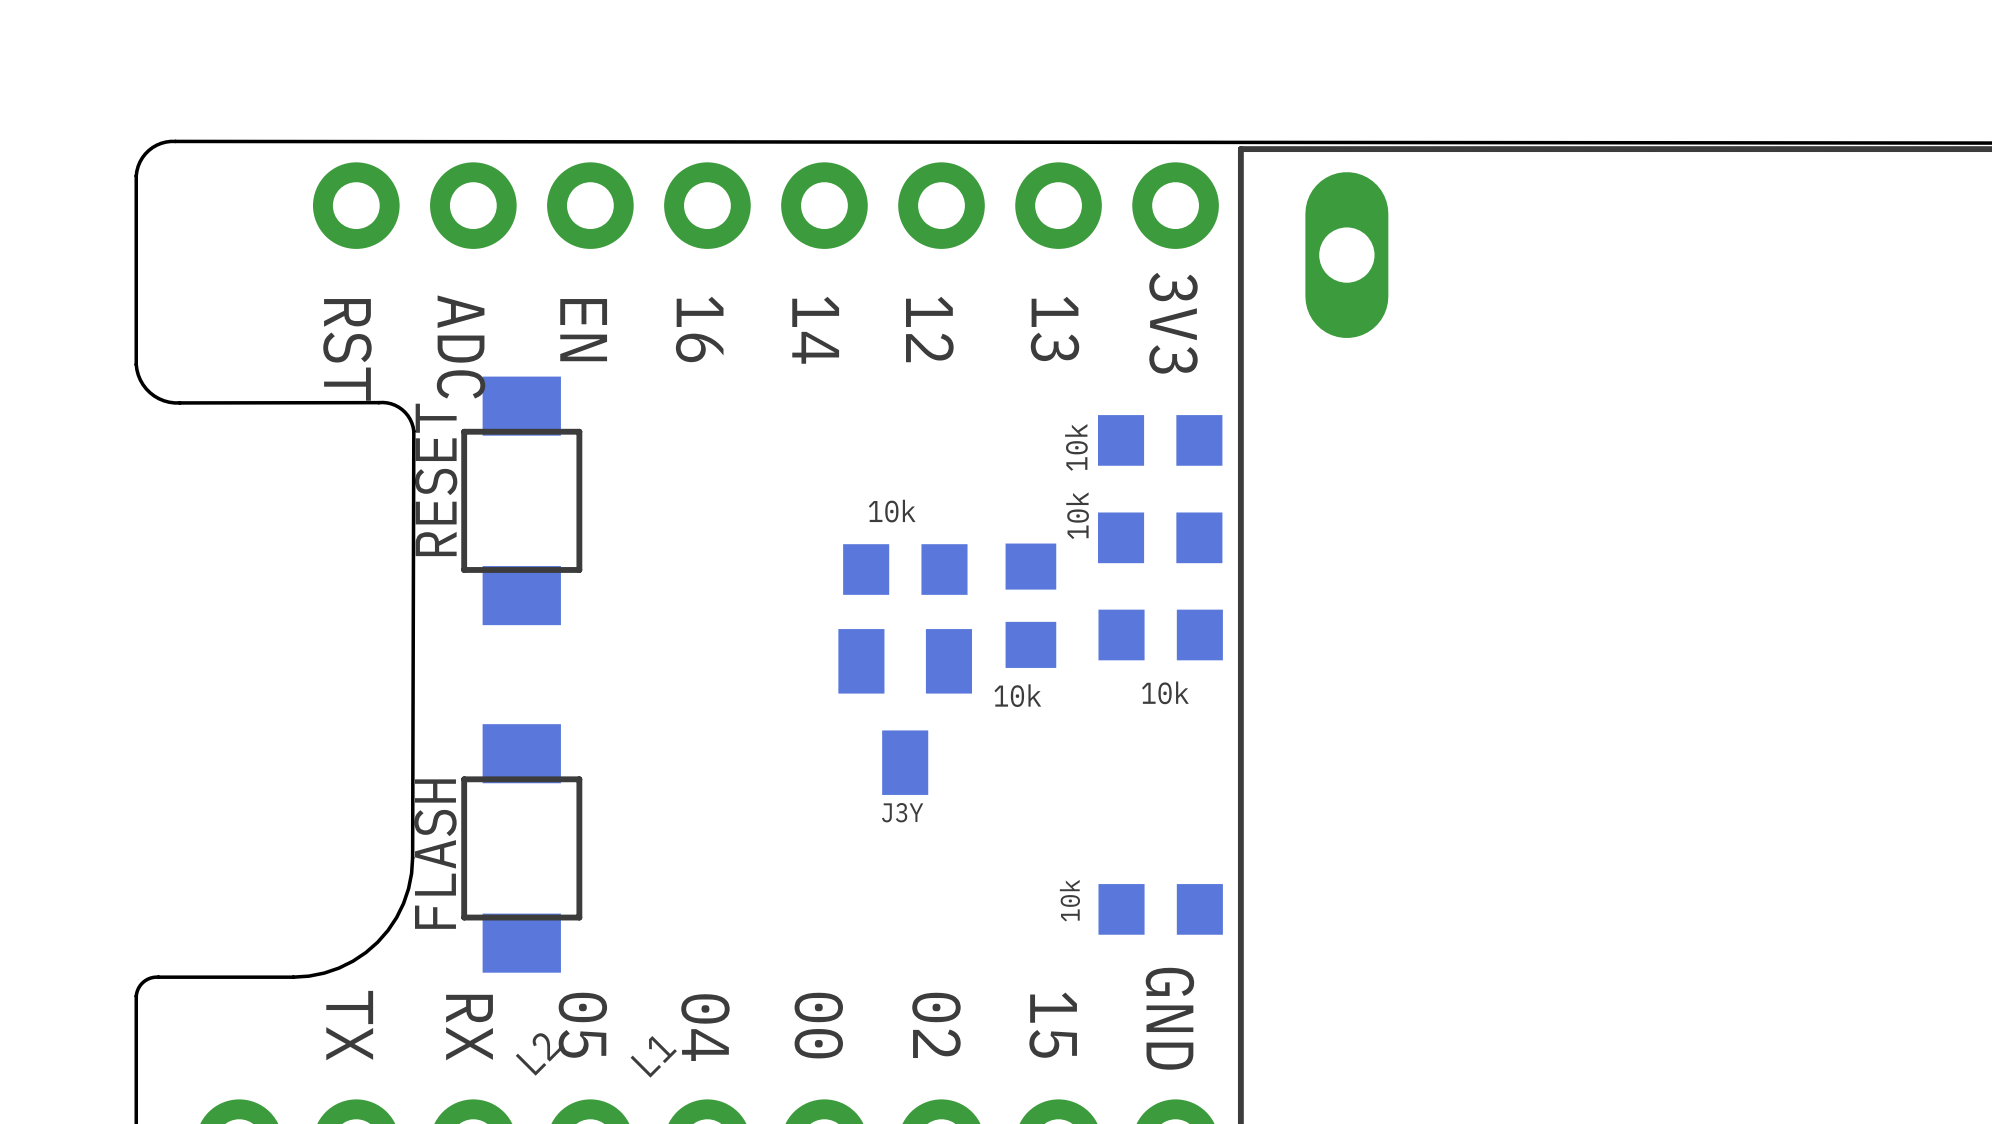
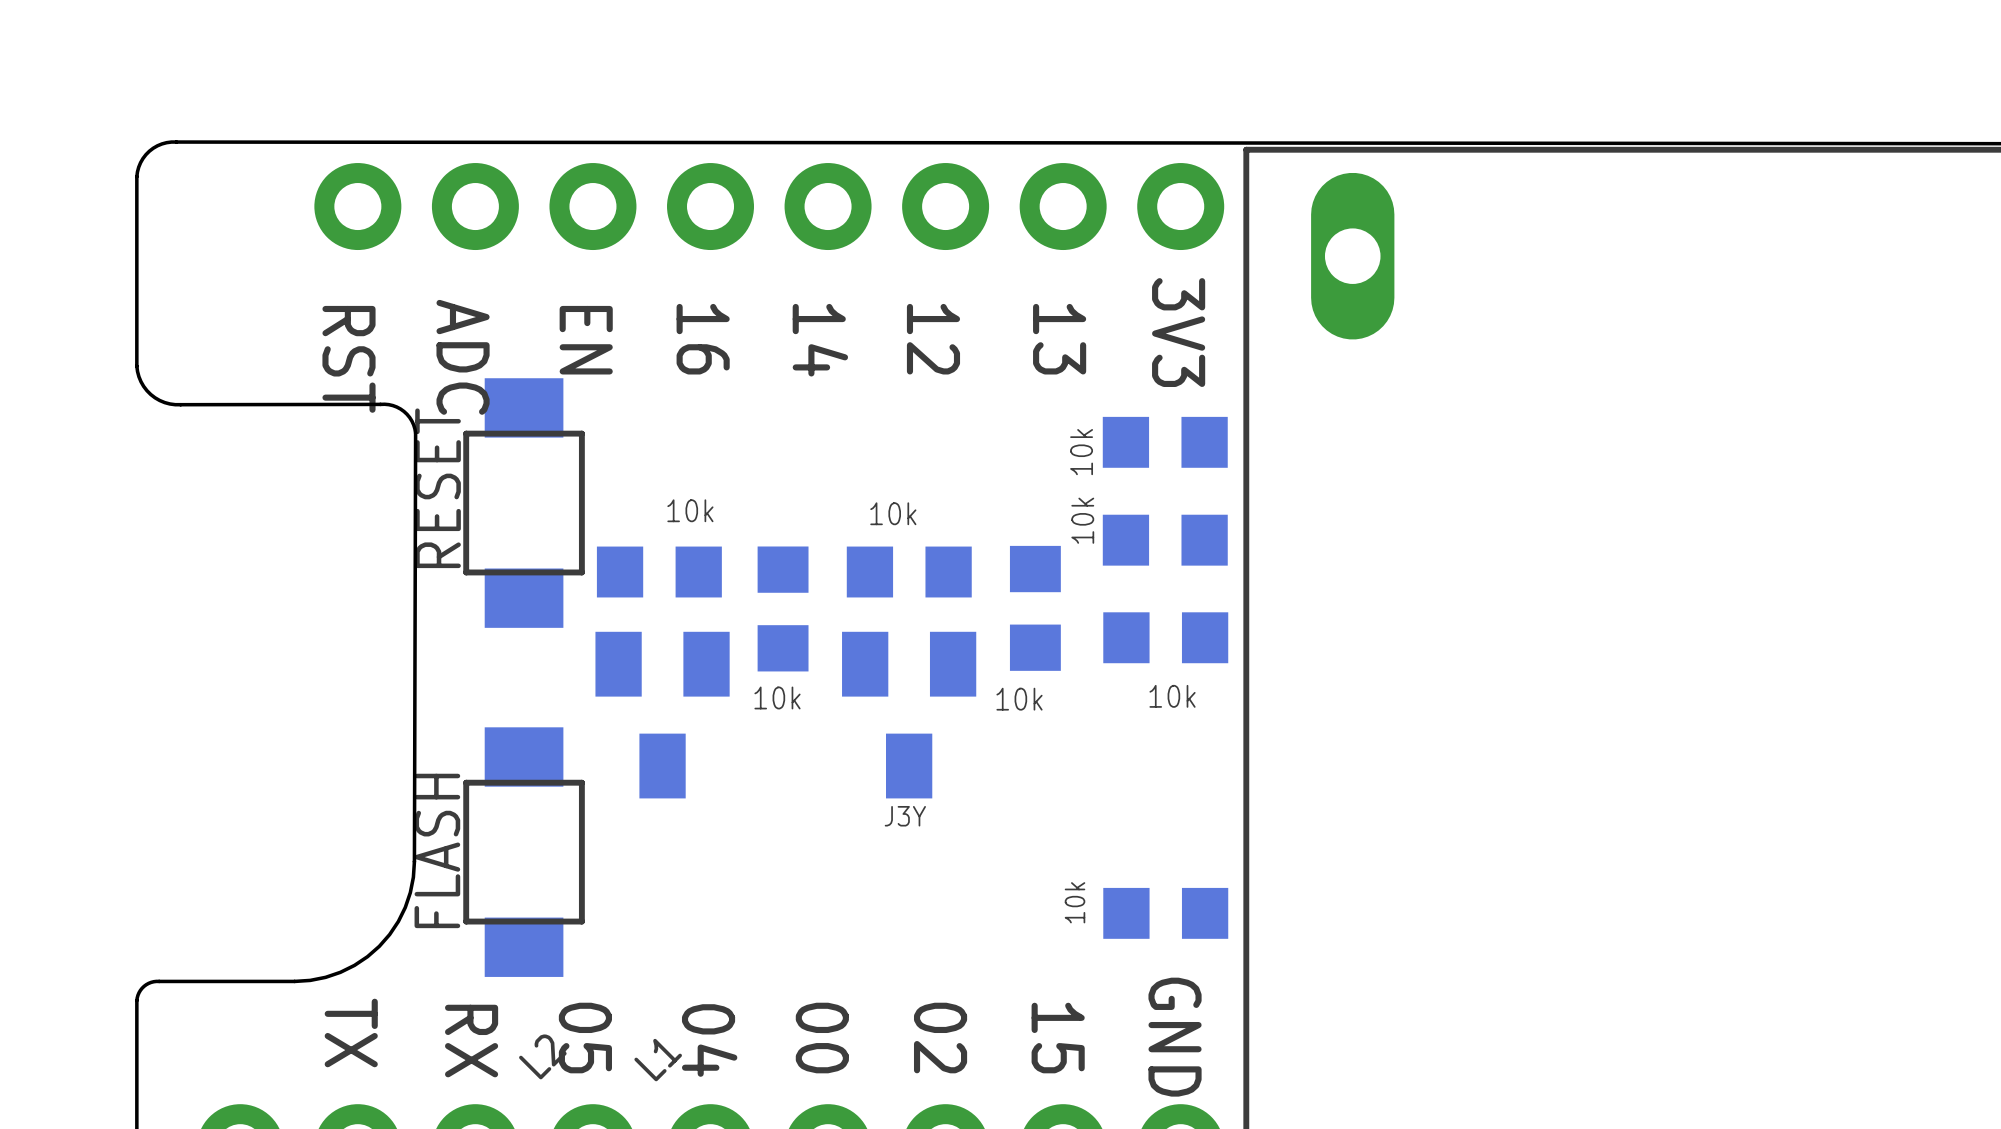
part: none -> 10k (659, 572)
part: none -> 10k (783, 608)
part: none -> (662, 715)

